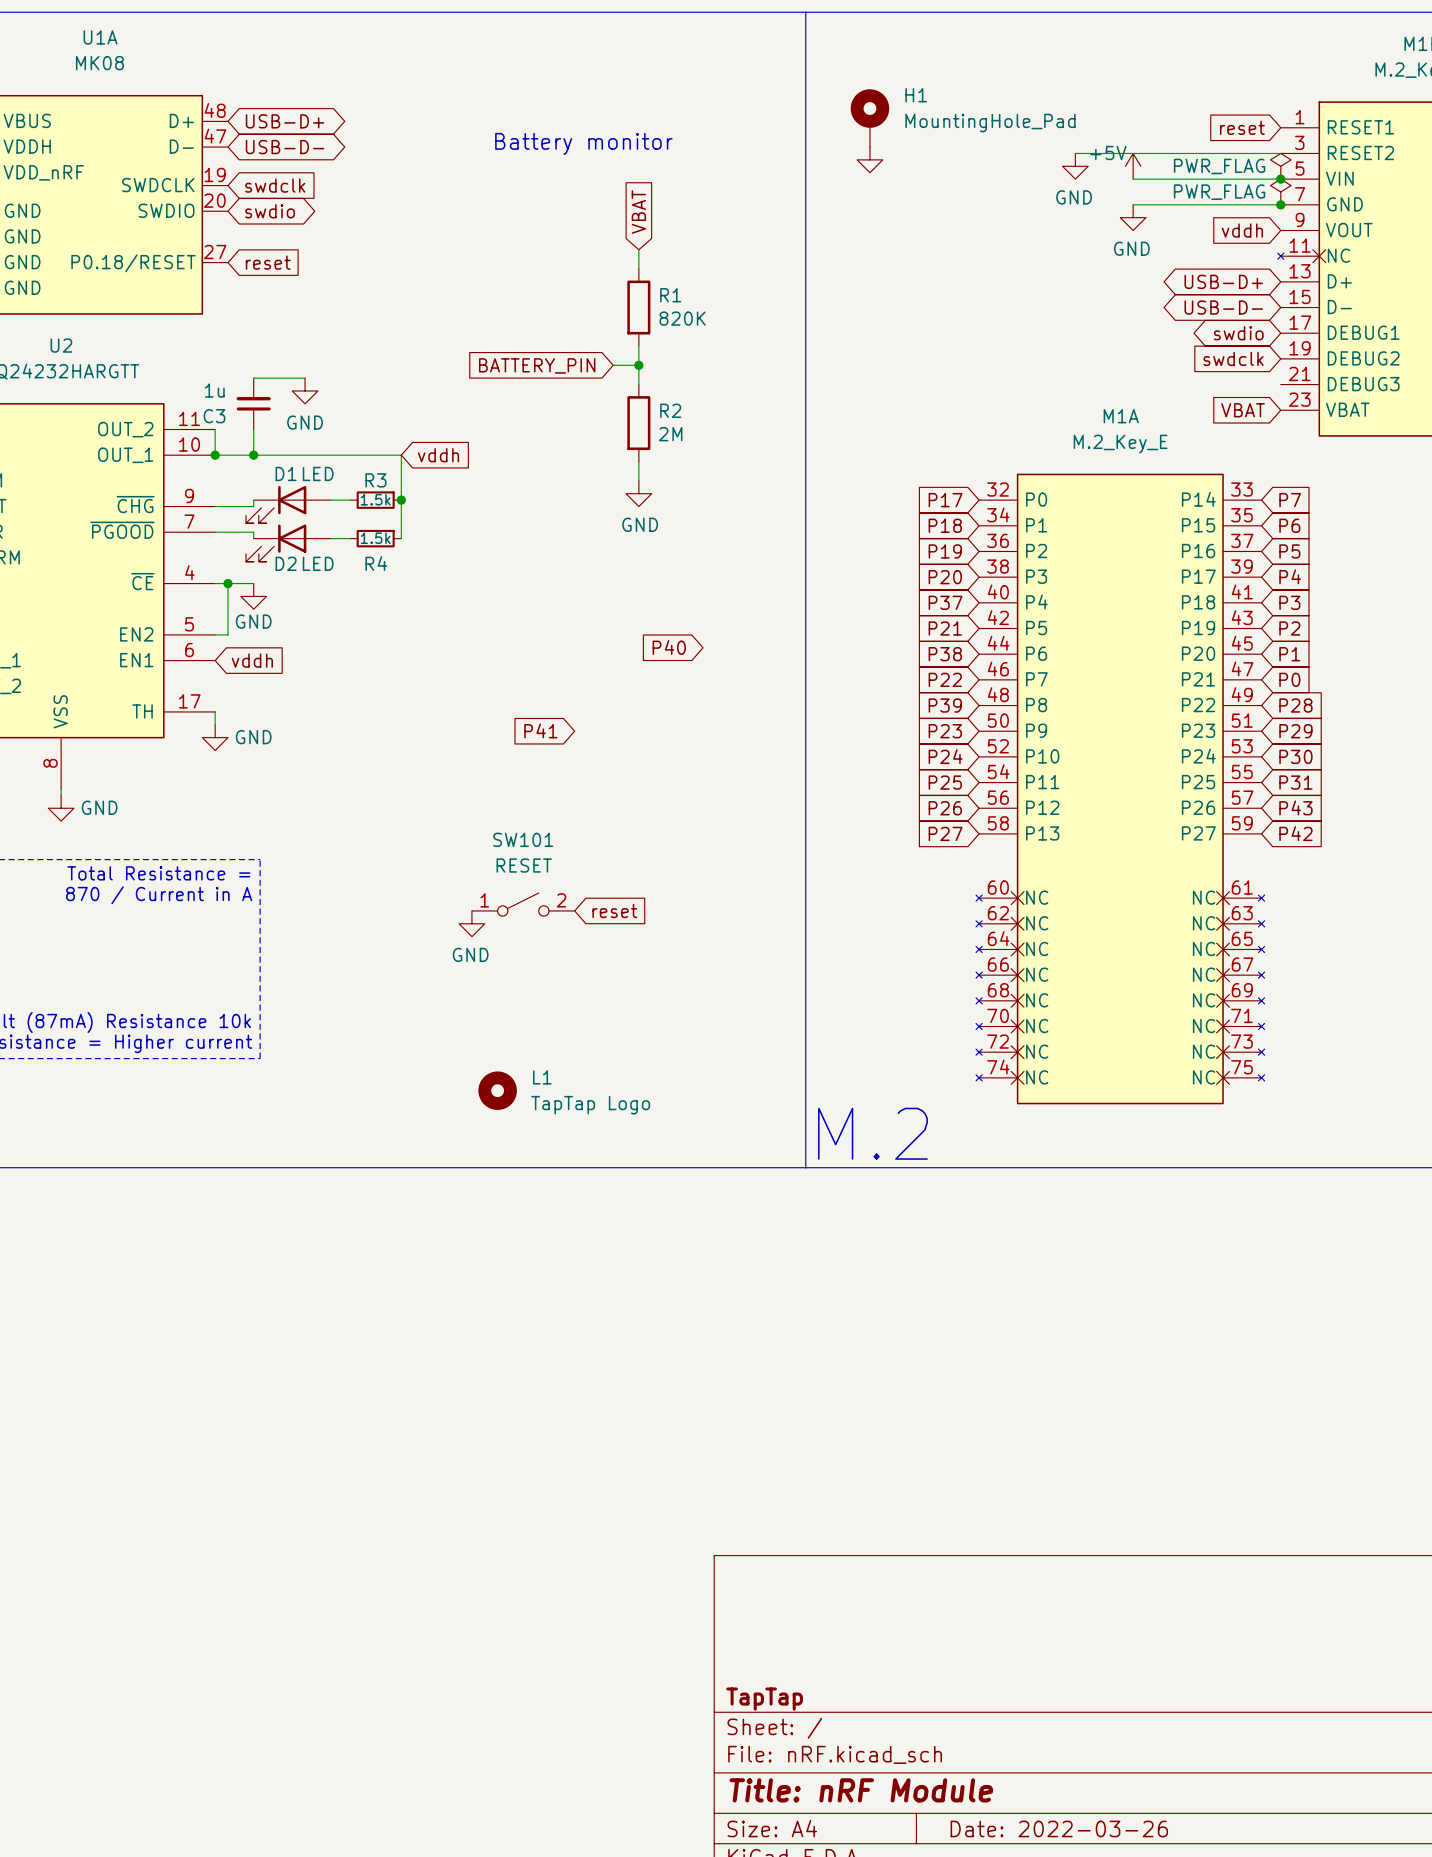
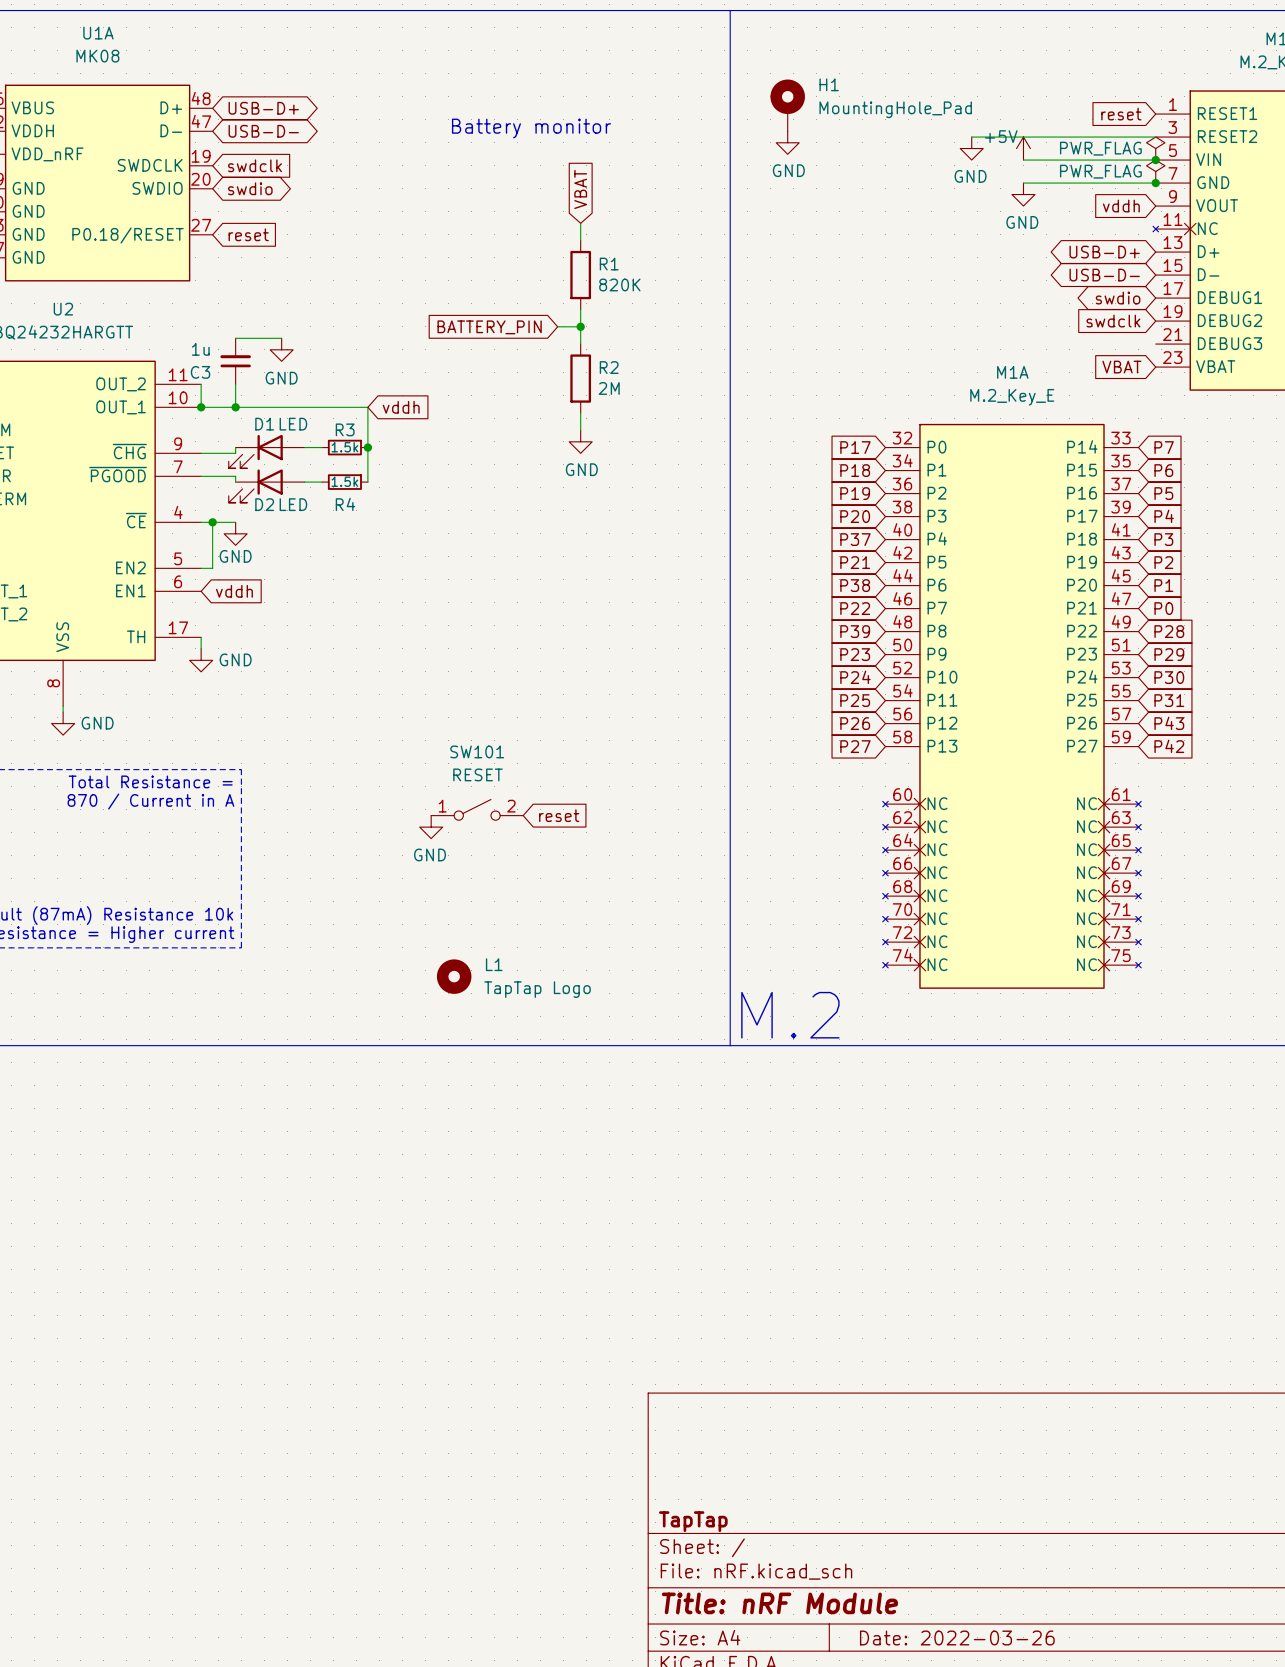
power symbol text: none -> GND (788, 170)
global label: P40 (669, 647) -> none
global label: P41 (540, 730) -> none

